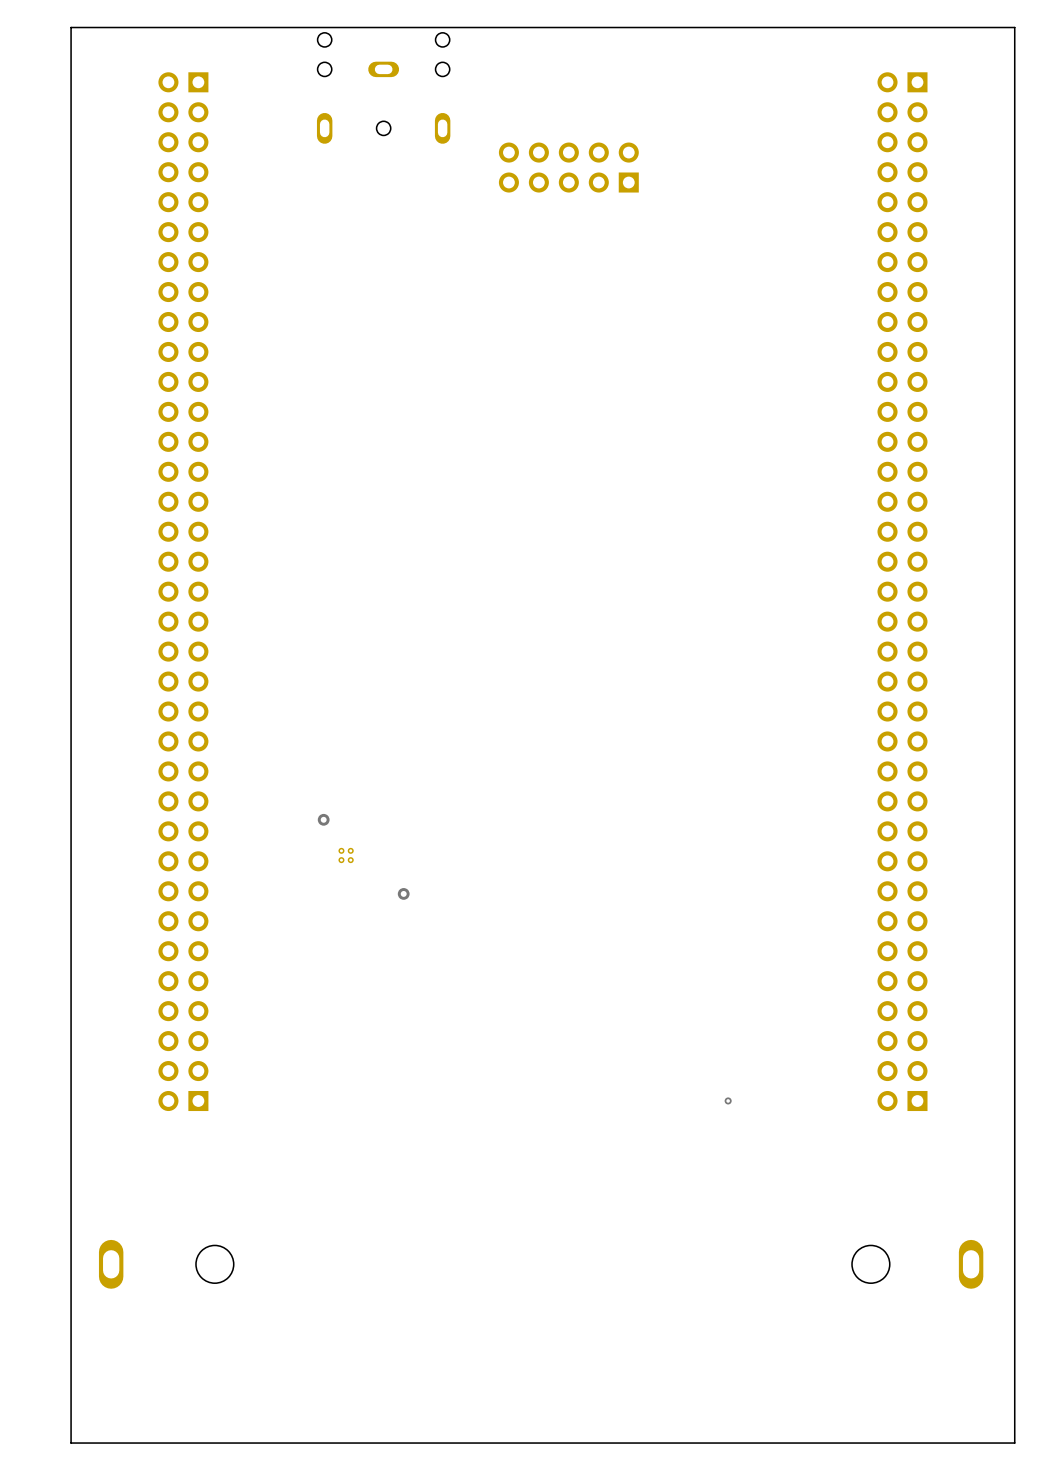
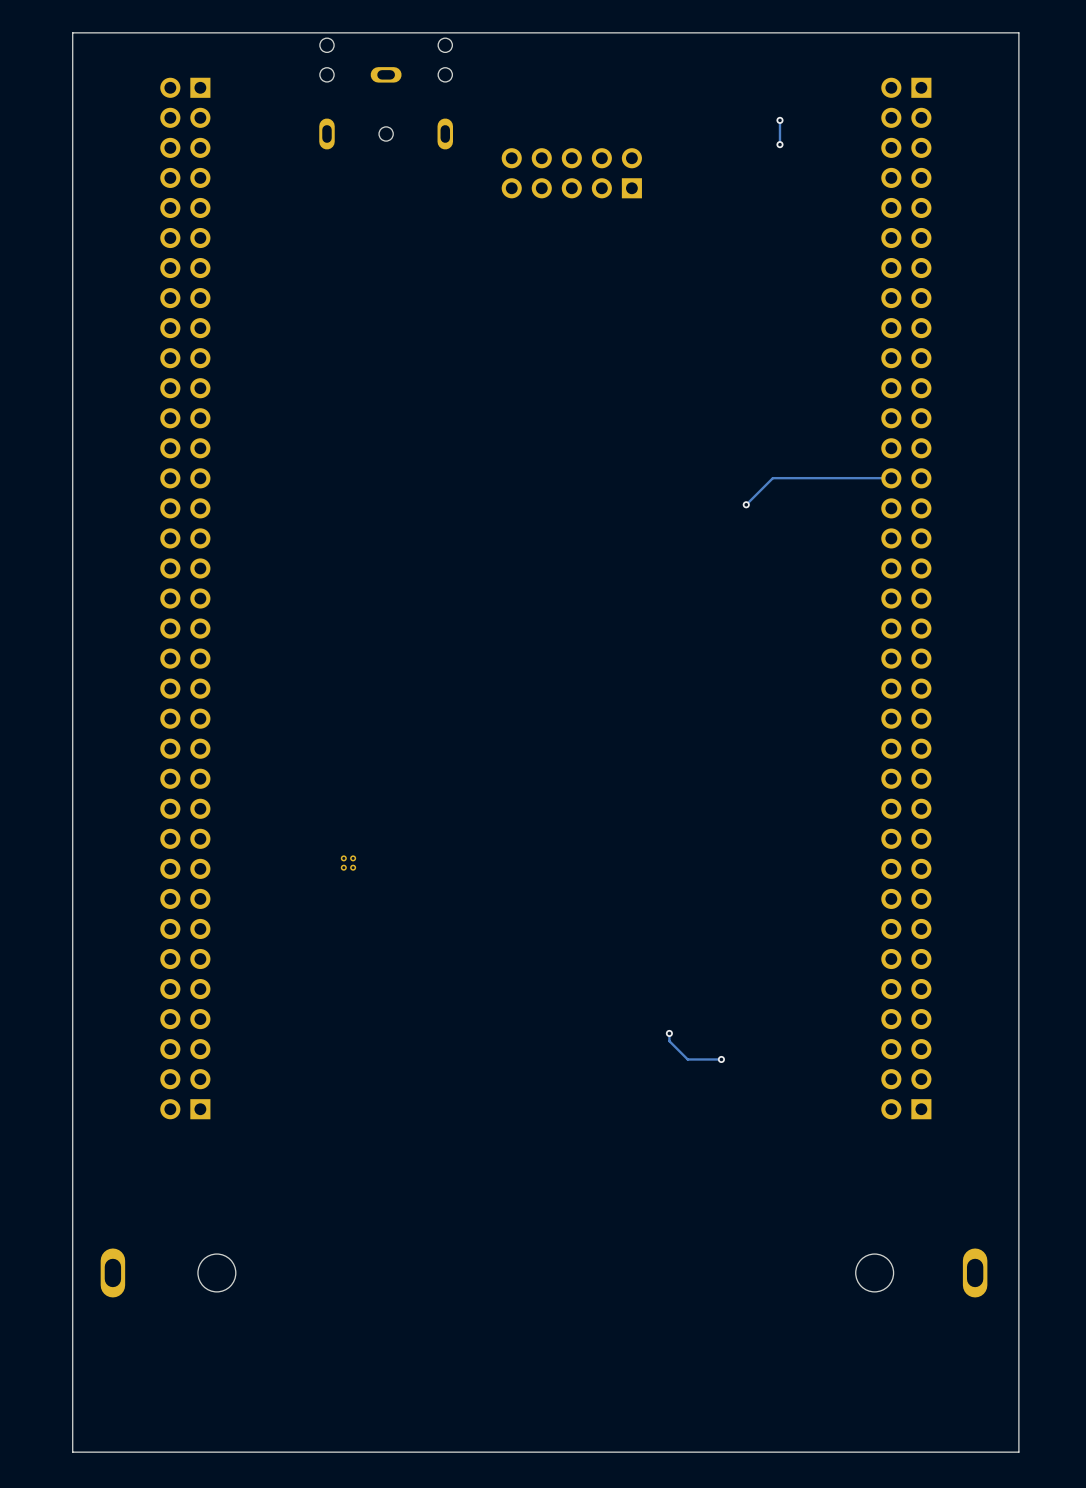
track: none -> (779, 120) (779, 144)
via: none -> (779, 120)
via: none -> (779, 144)
track: none -> (891, 478) (772, 478) (746, 504)
via: none -> (746, 504)
via: (323, 819) -> none
via: (403, 893) -> none
track: none -> (669, 1033) (669, 1041) (687, 1059) (721, 1059)
via: none -> (669, 1033)
via: none -> (721, 1059)
via: (728, 1100) -> none

